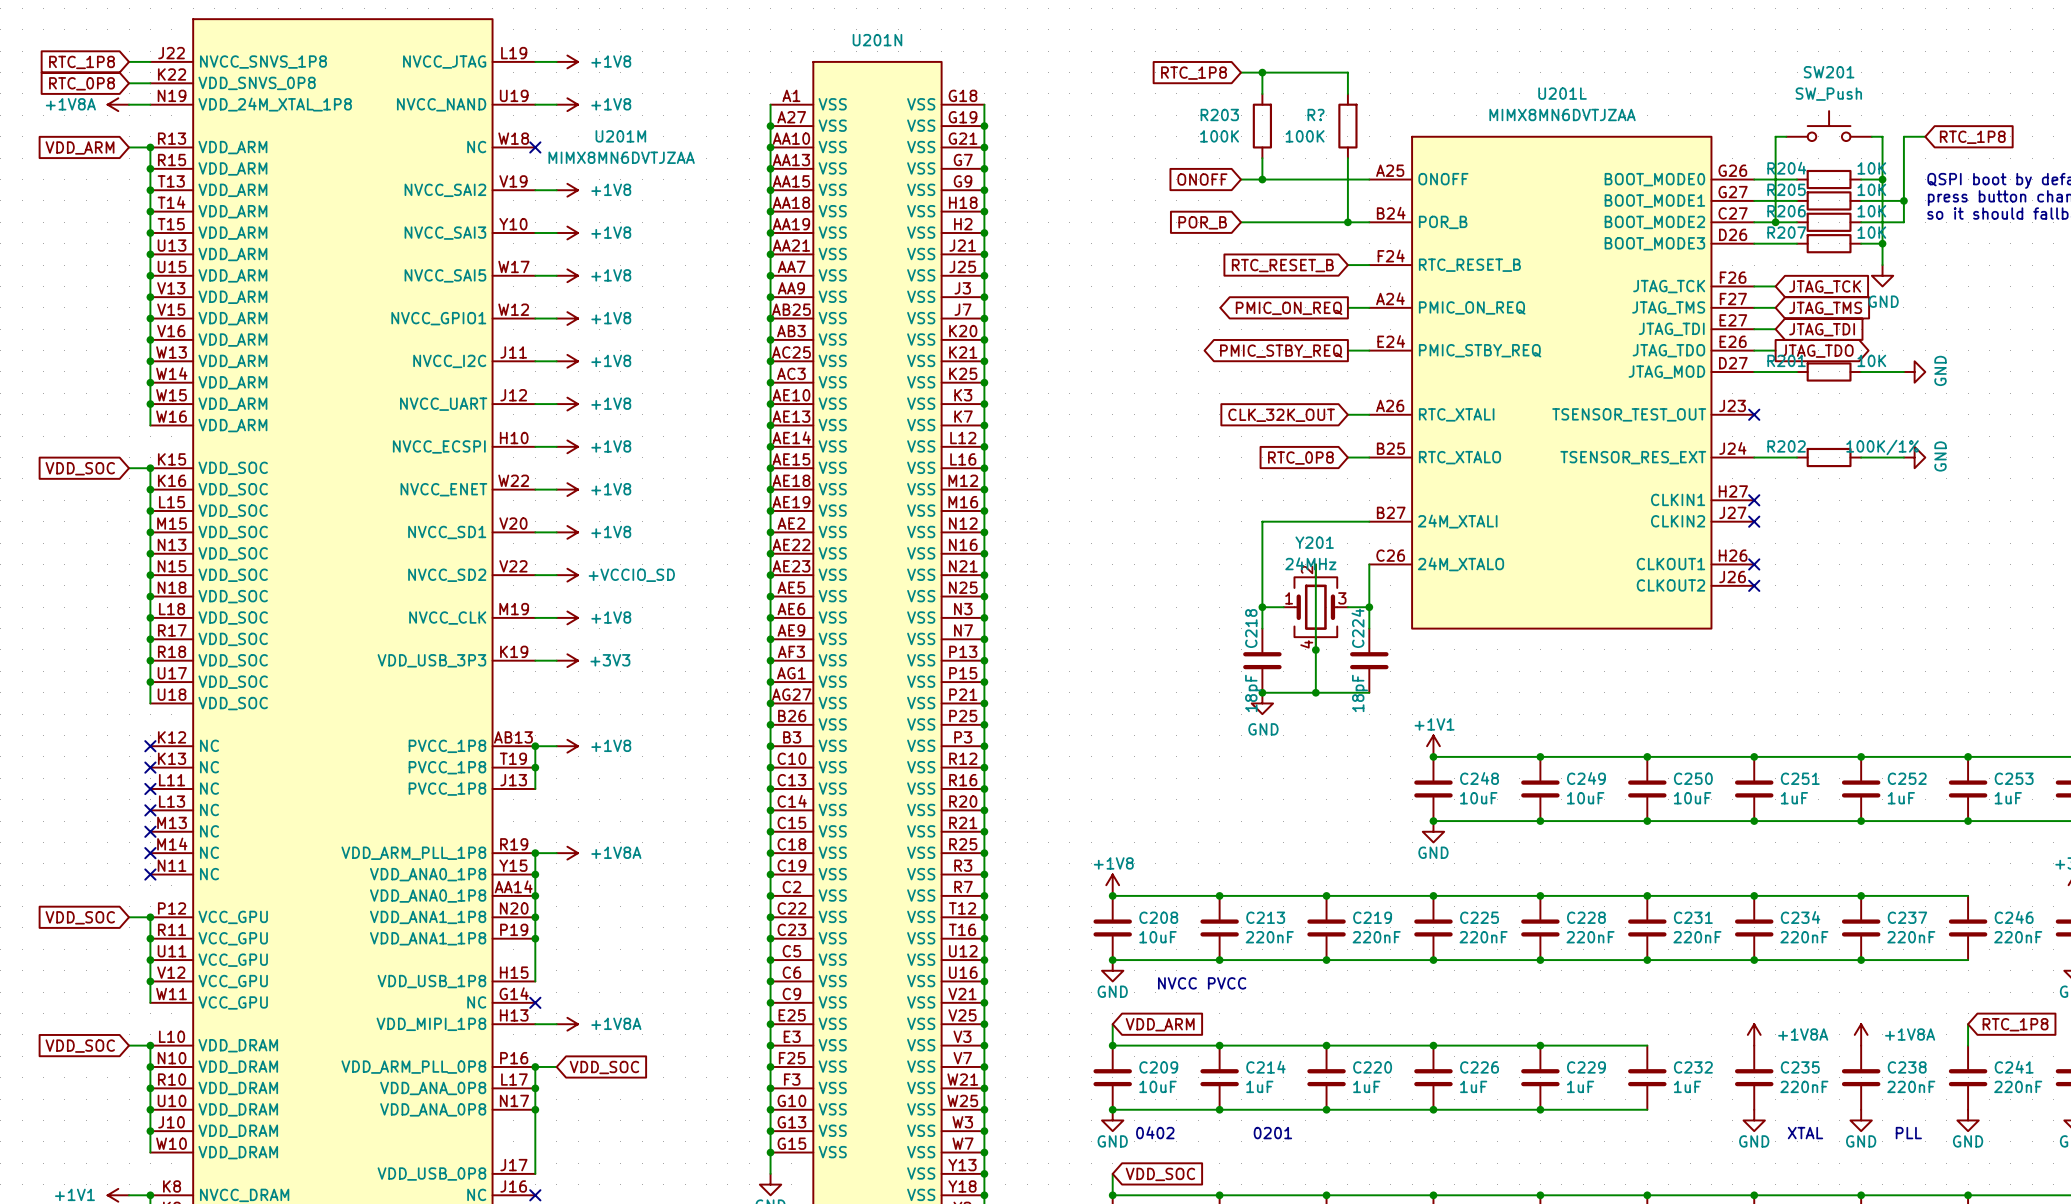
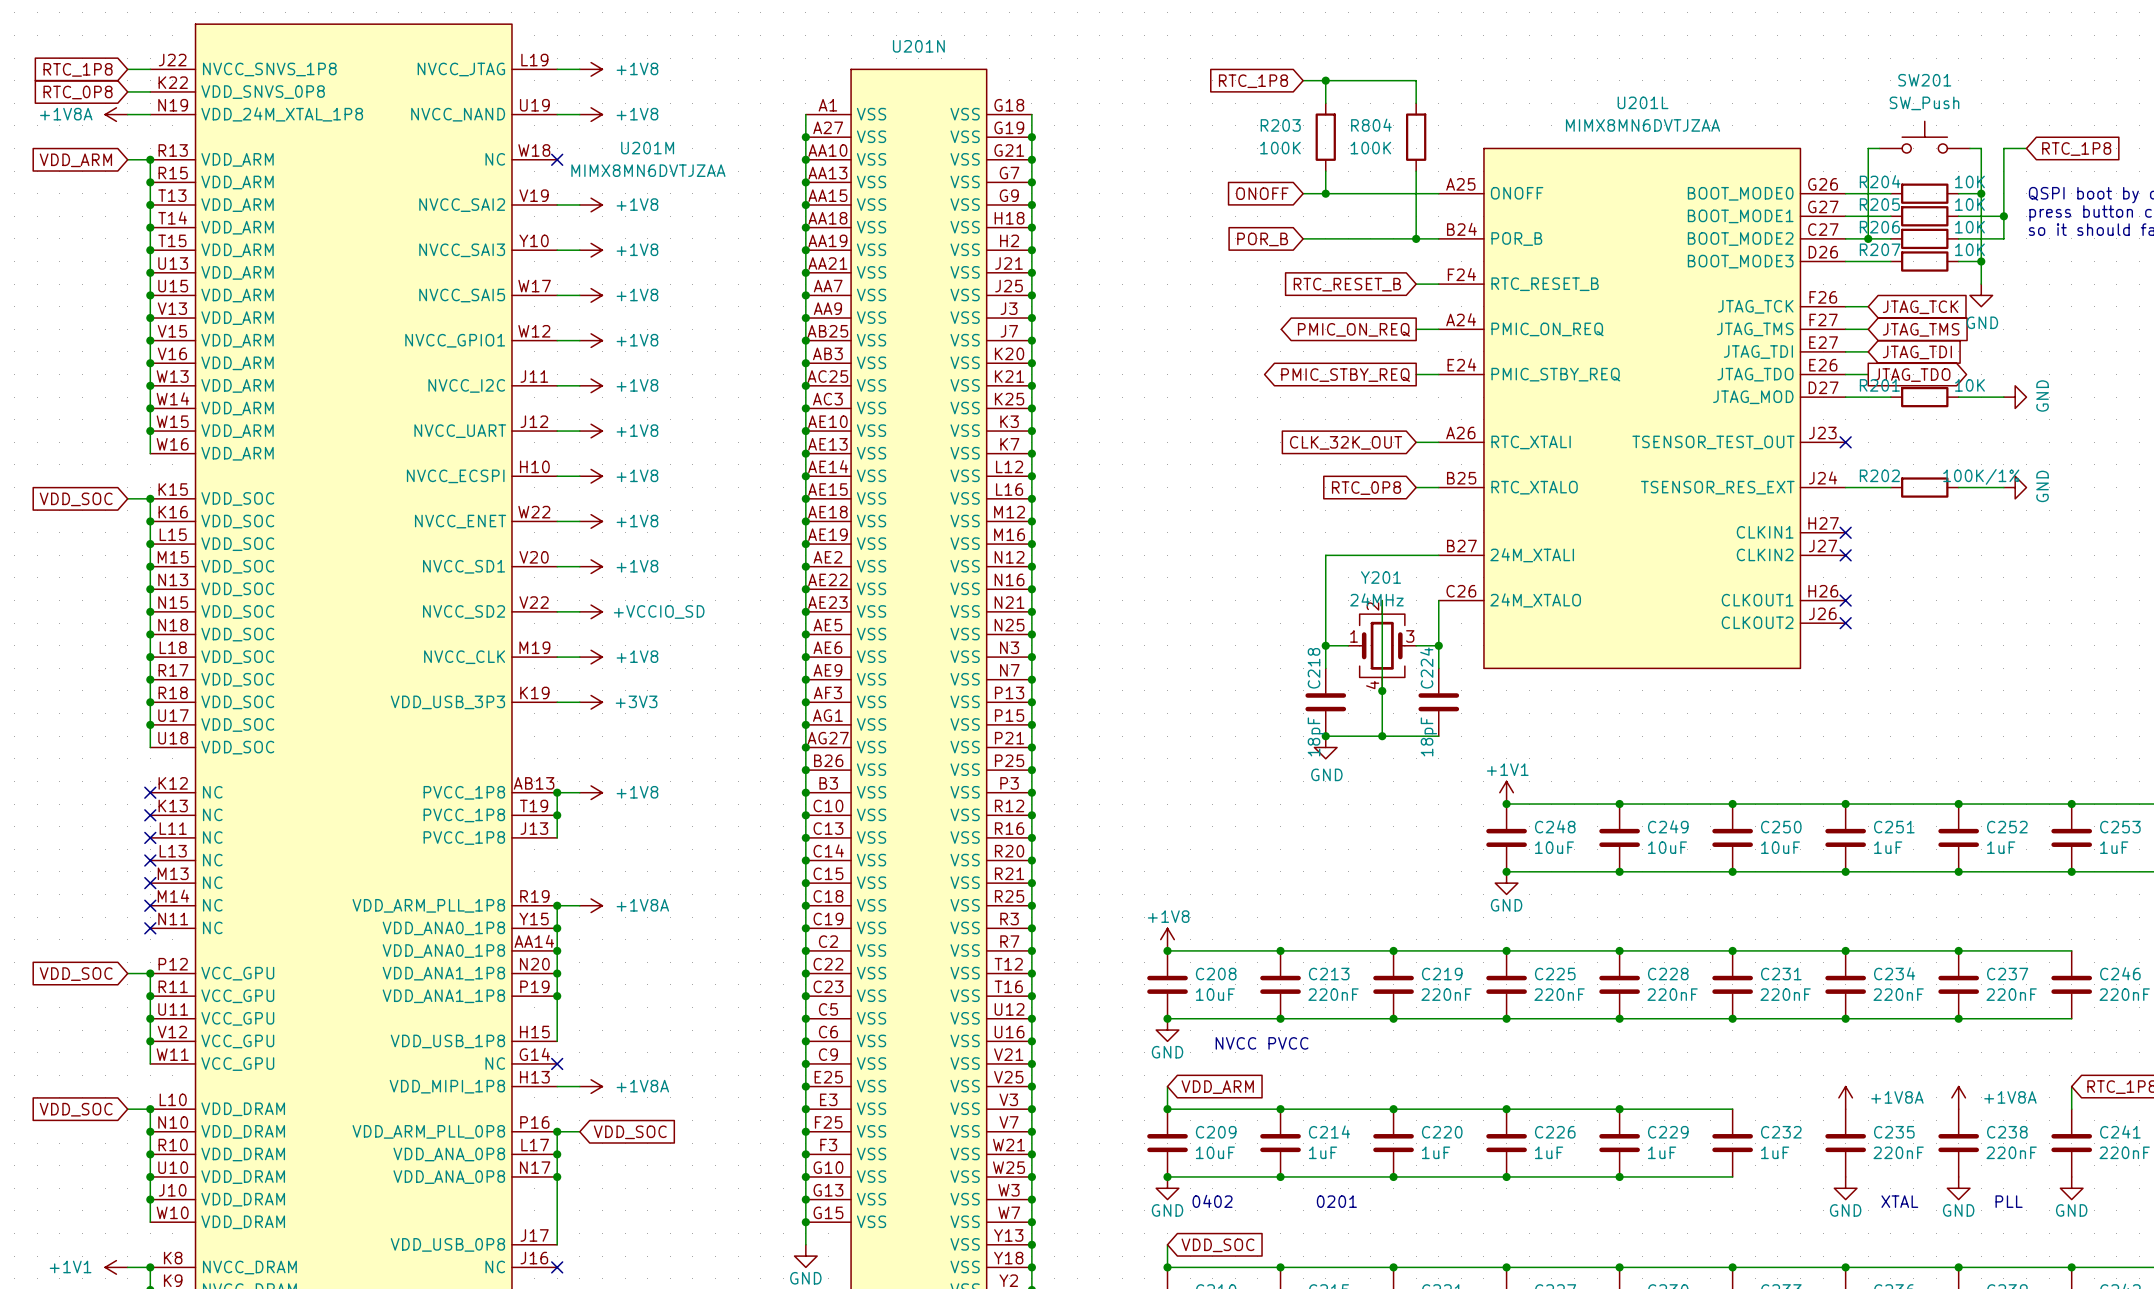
R? name: R? (1316, 114) -> R804 (1371, 125)

